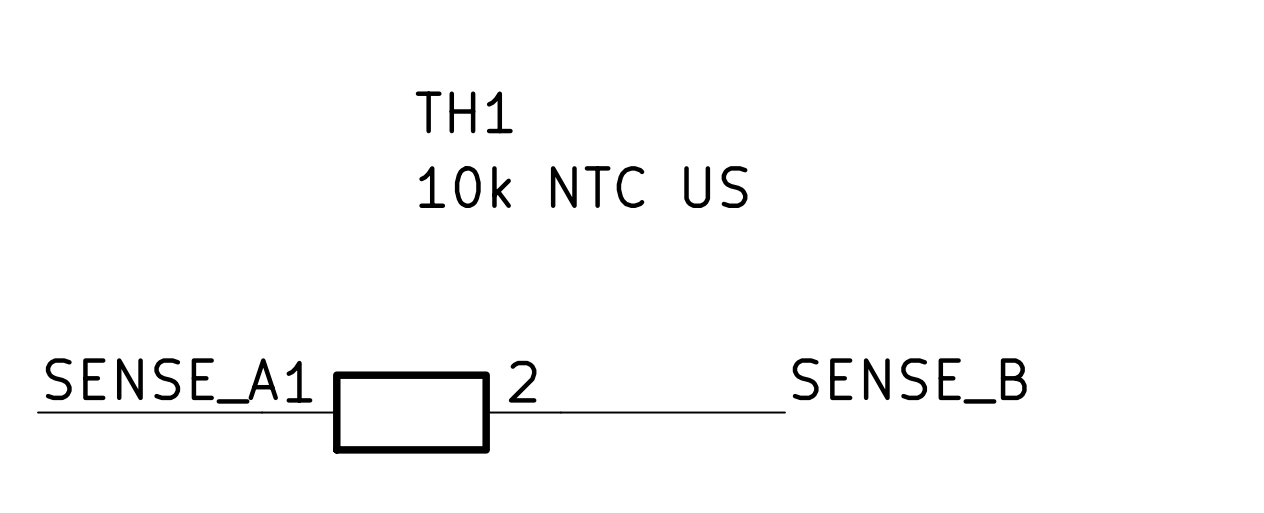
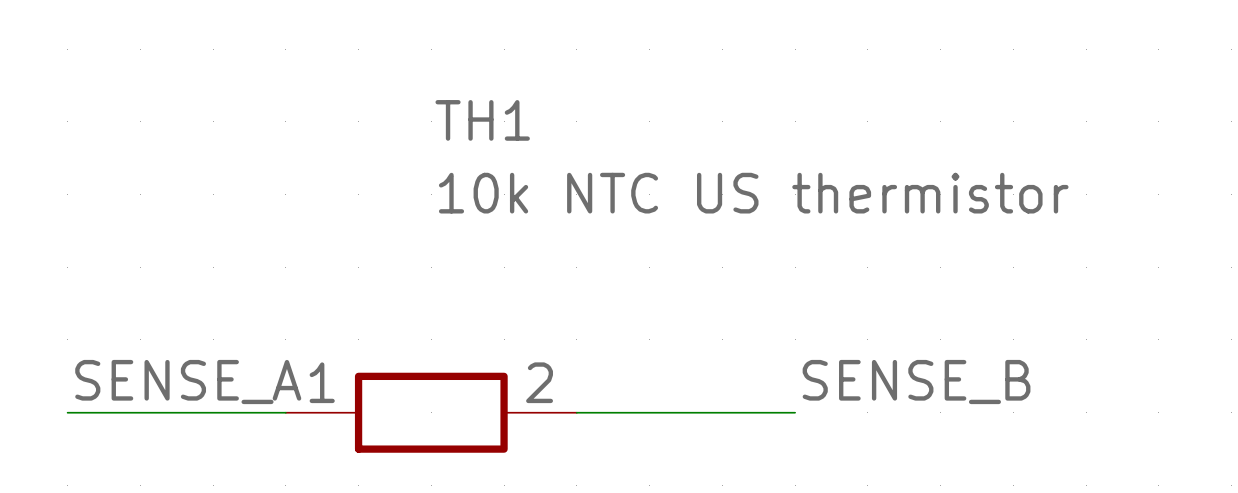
TH1 value: 10k NTC US (583, 187) -> 10k NTC US thermistor (753, 193)

